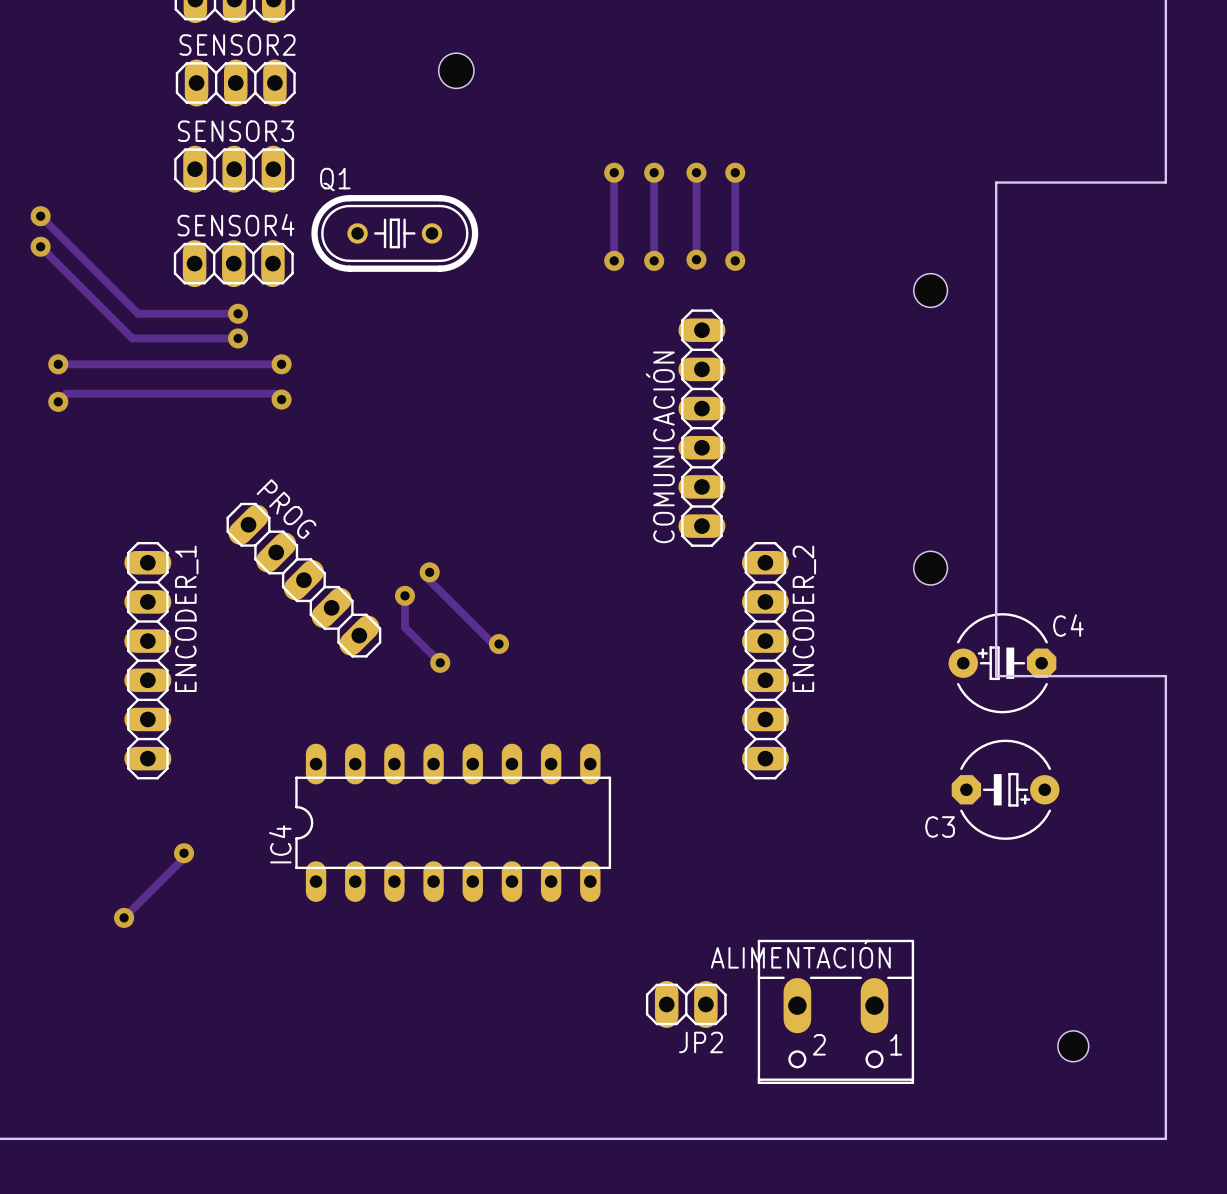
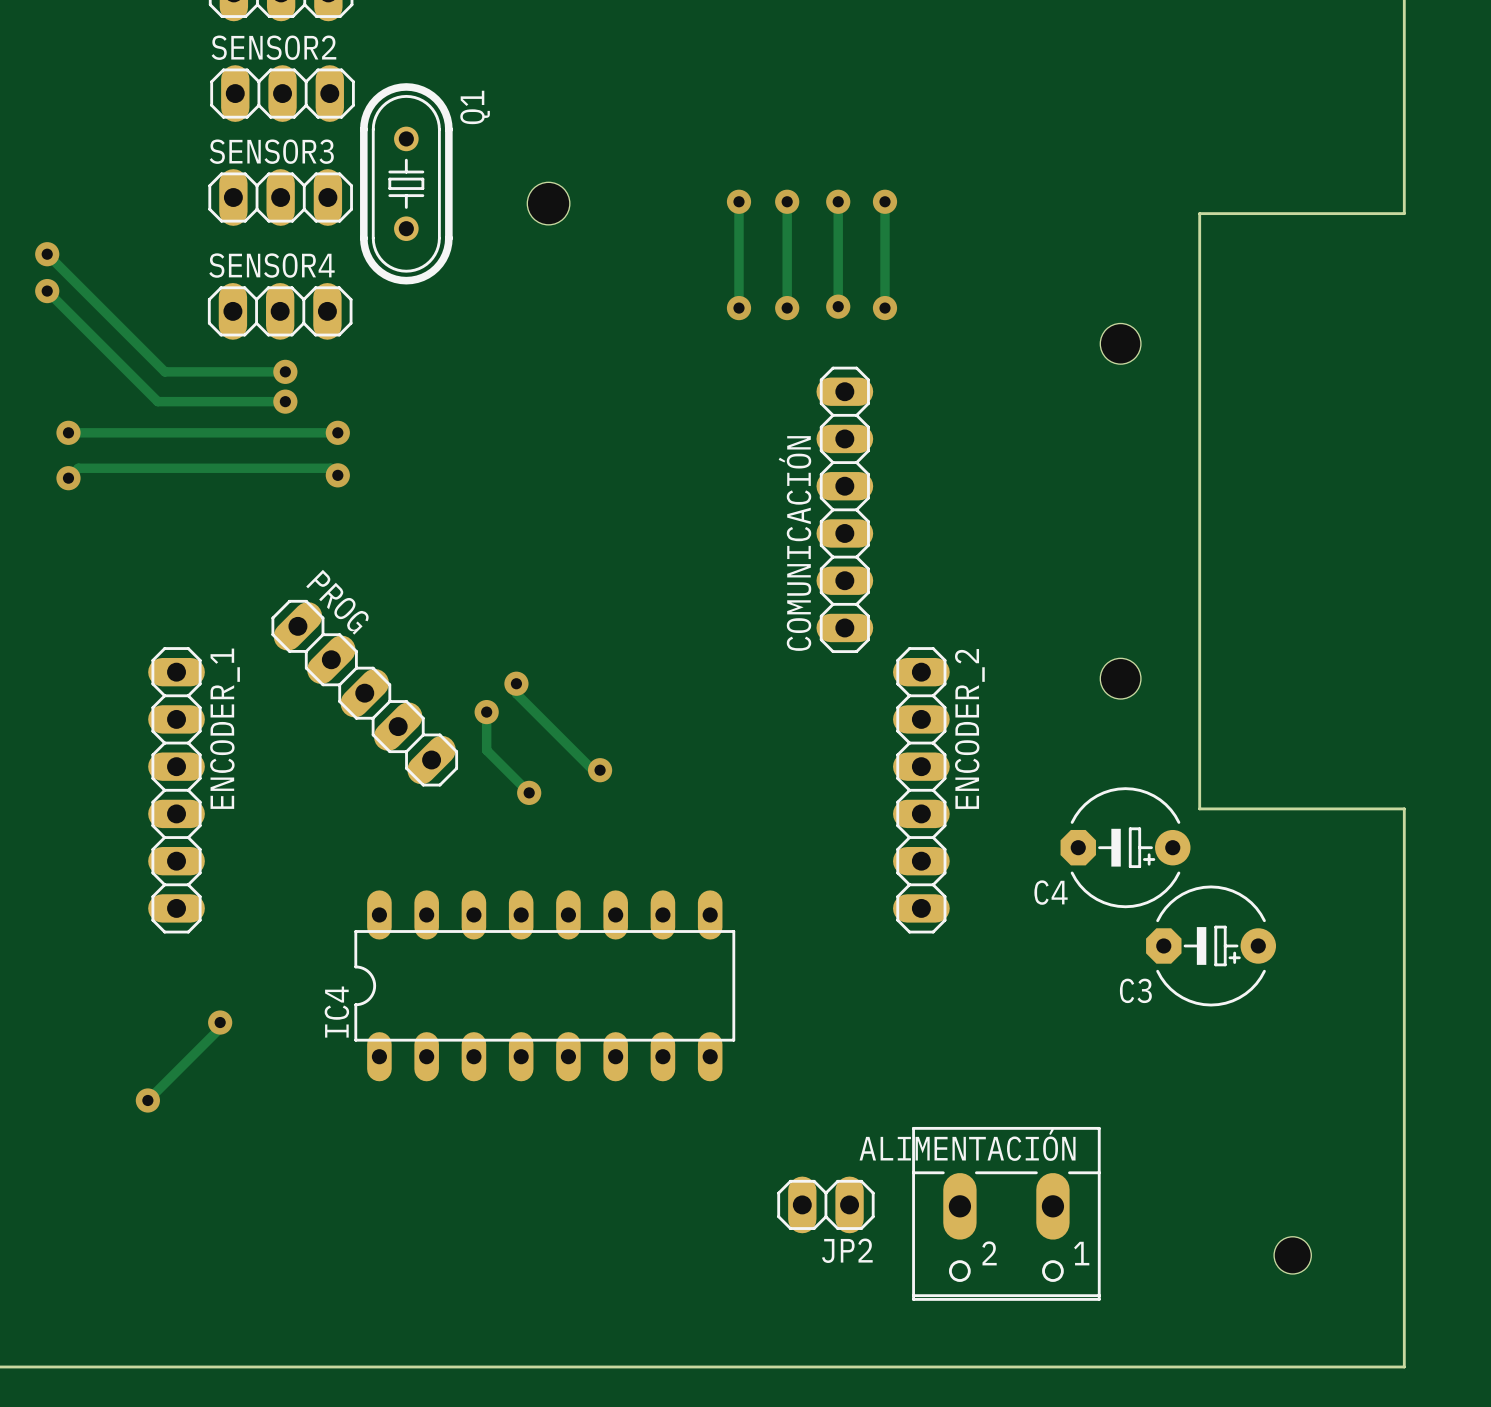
hole: (456, 70) -> none
hole: none -> (548, 203)
Q1 rotation: 0° (394, 233) -> 90° clockwise (406, 183)
C4 rotation: 0° (1002, 663) -> 180° (1125, 847)
C4 position: (1002, 663) -> (1125, 847)

